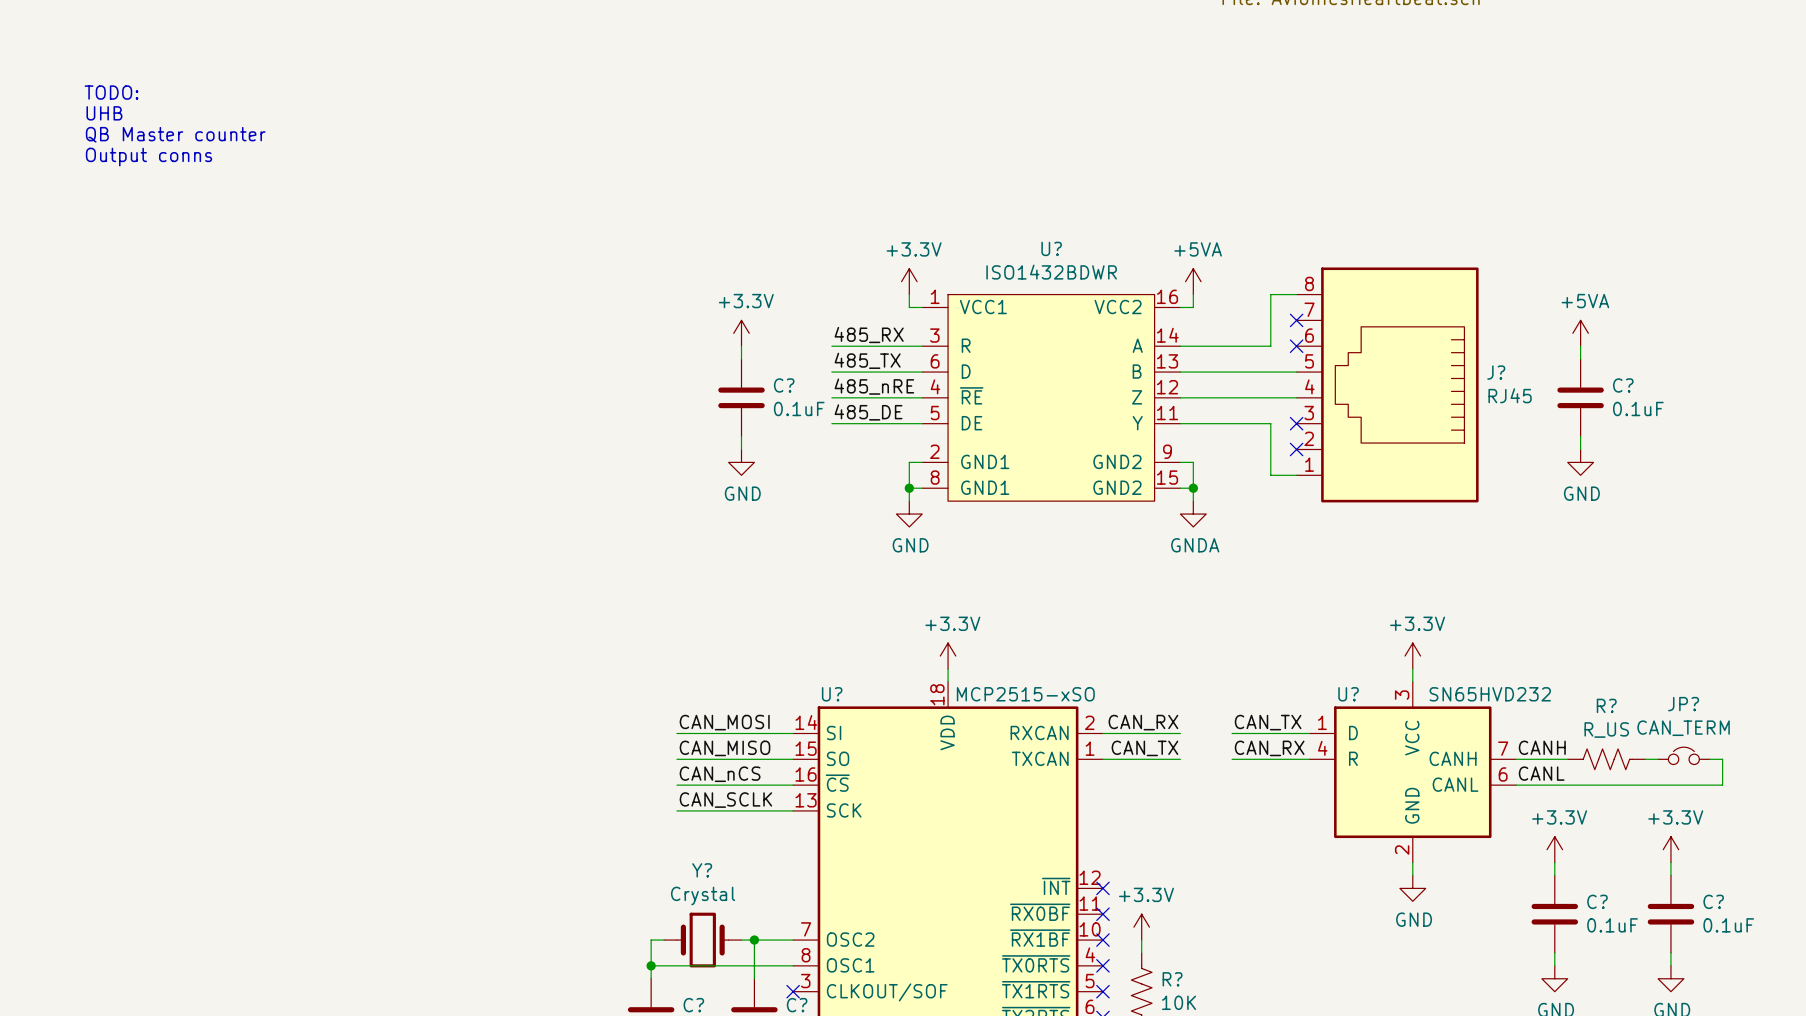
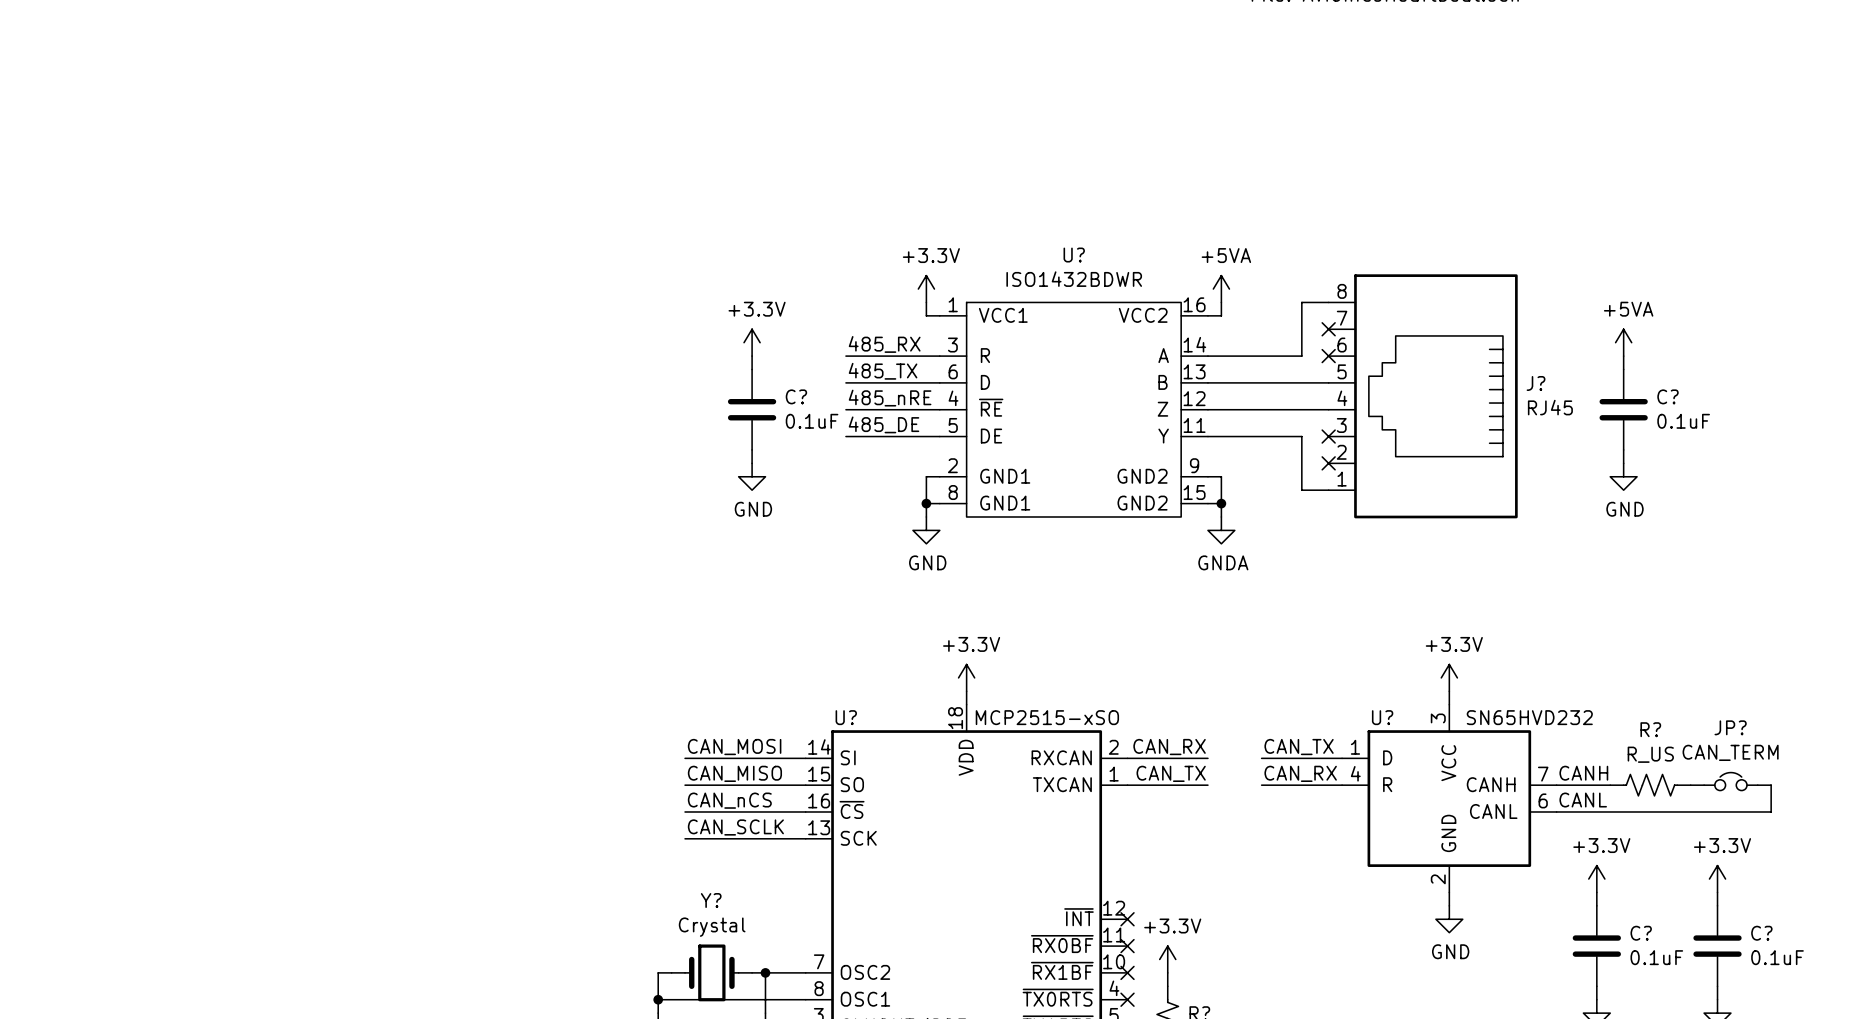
text: TODO: (111, 92) -> none
text: UHB (104, 113) -> none
text: QB Master counter (175, 134) -> none
text: Output conns (149, 157) -> none

